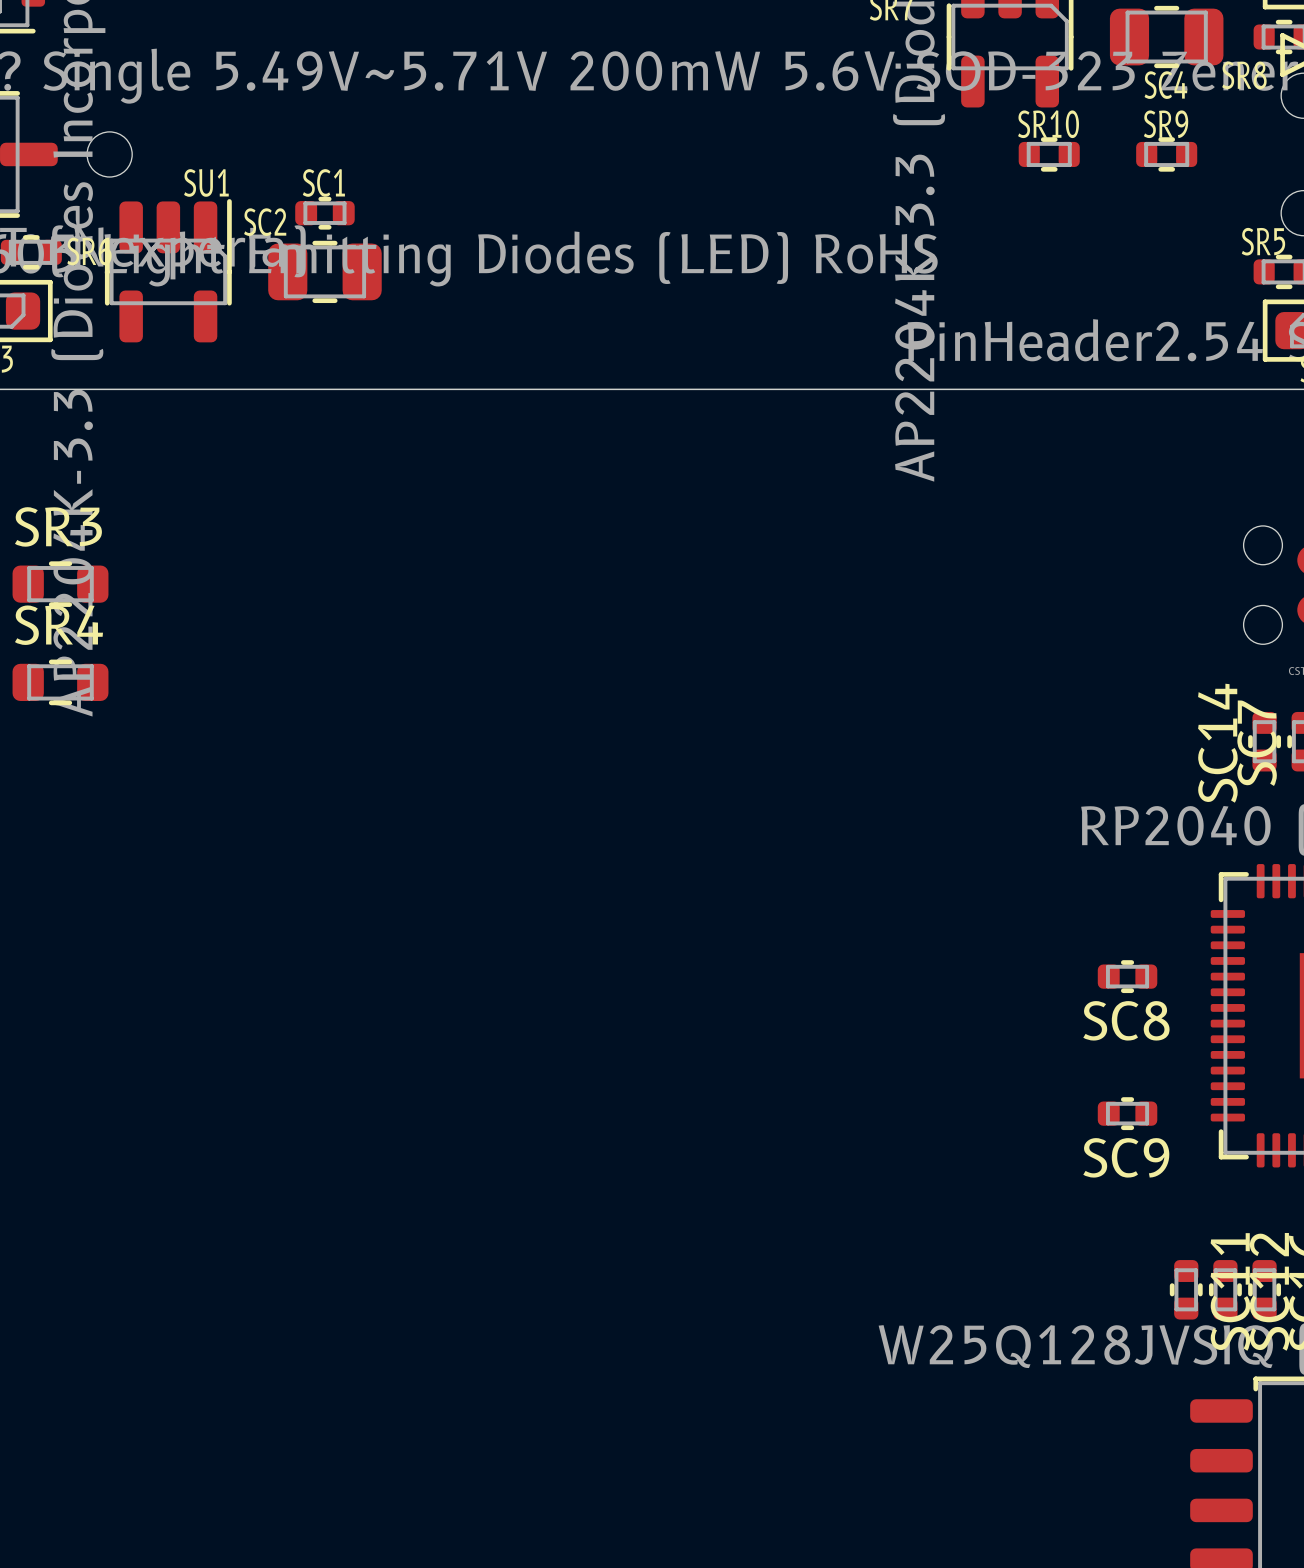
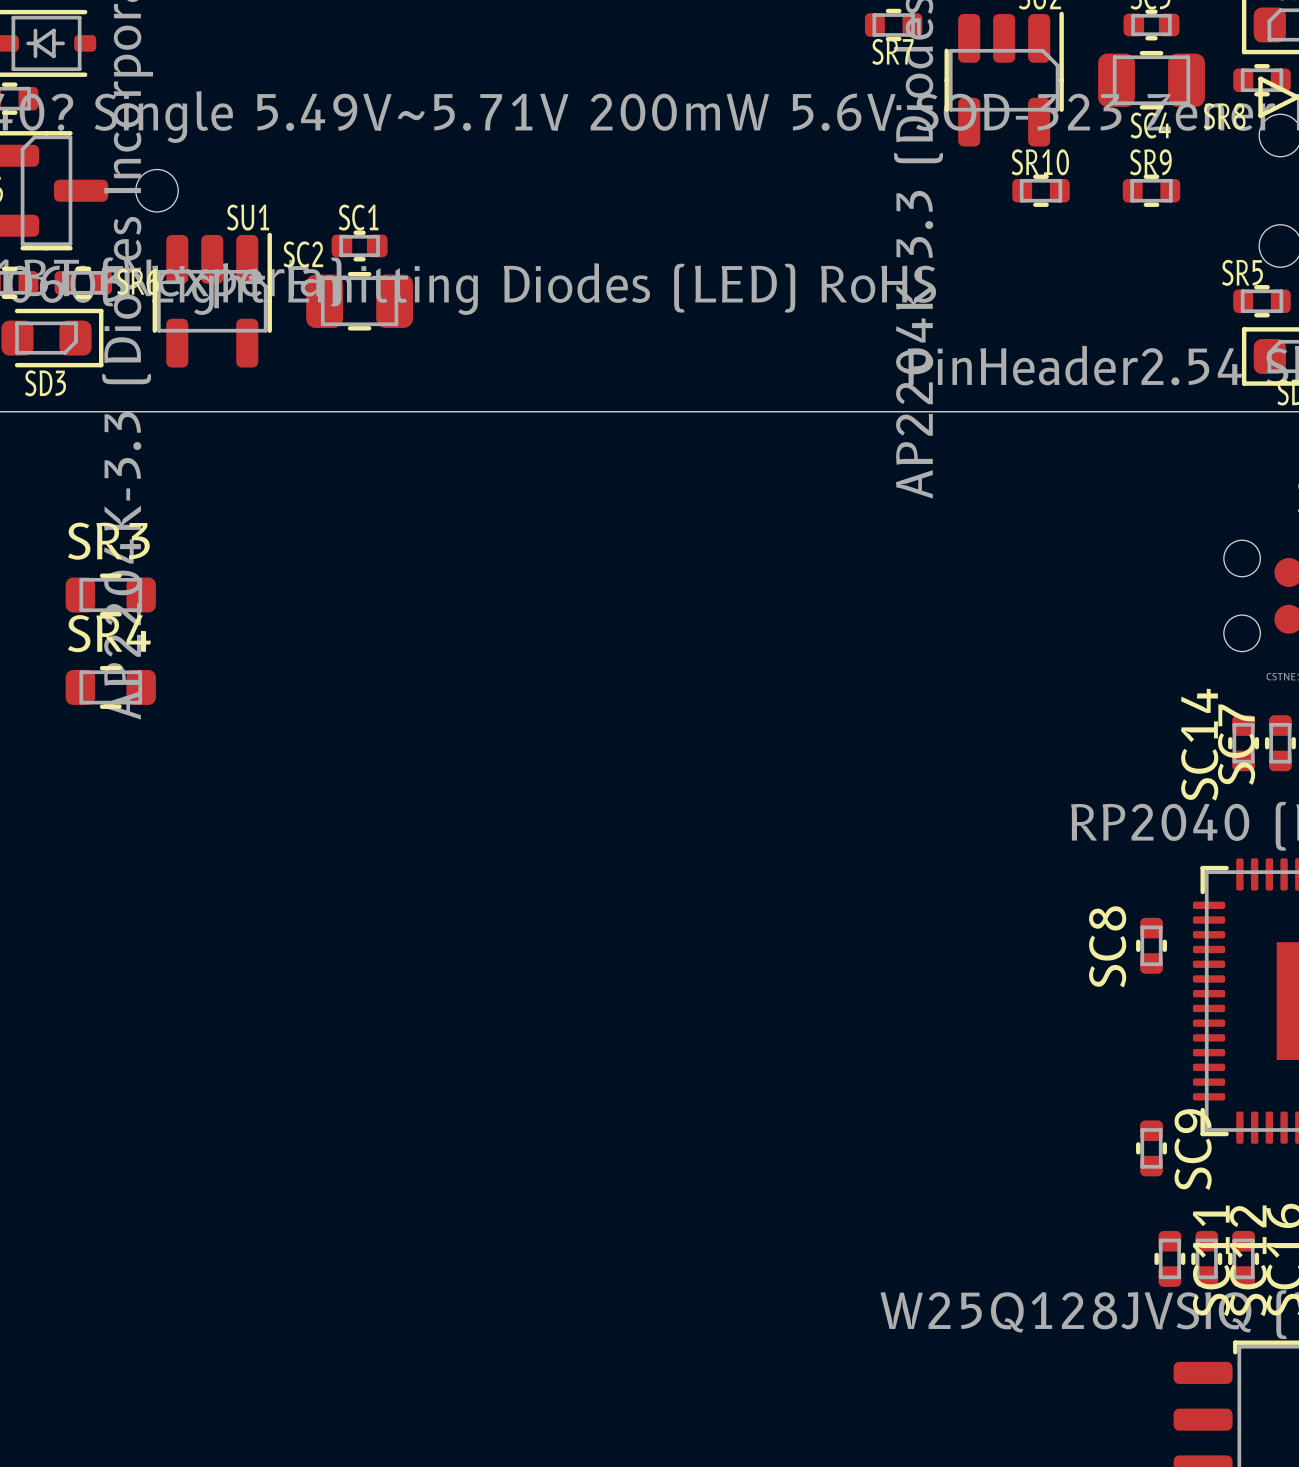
SC8 rotation: 0° (1127, 976) -> 90° clockwise (1151, 945)
SC8 position: (1127, 976) -> (1151, 945)
SC9 rotation: 0° (1127, 1113) -> 90° clockwise (1151, 1148)
SC9 position: (1127, 1113) -> (1151, 1148)

